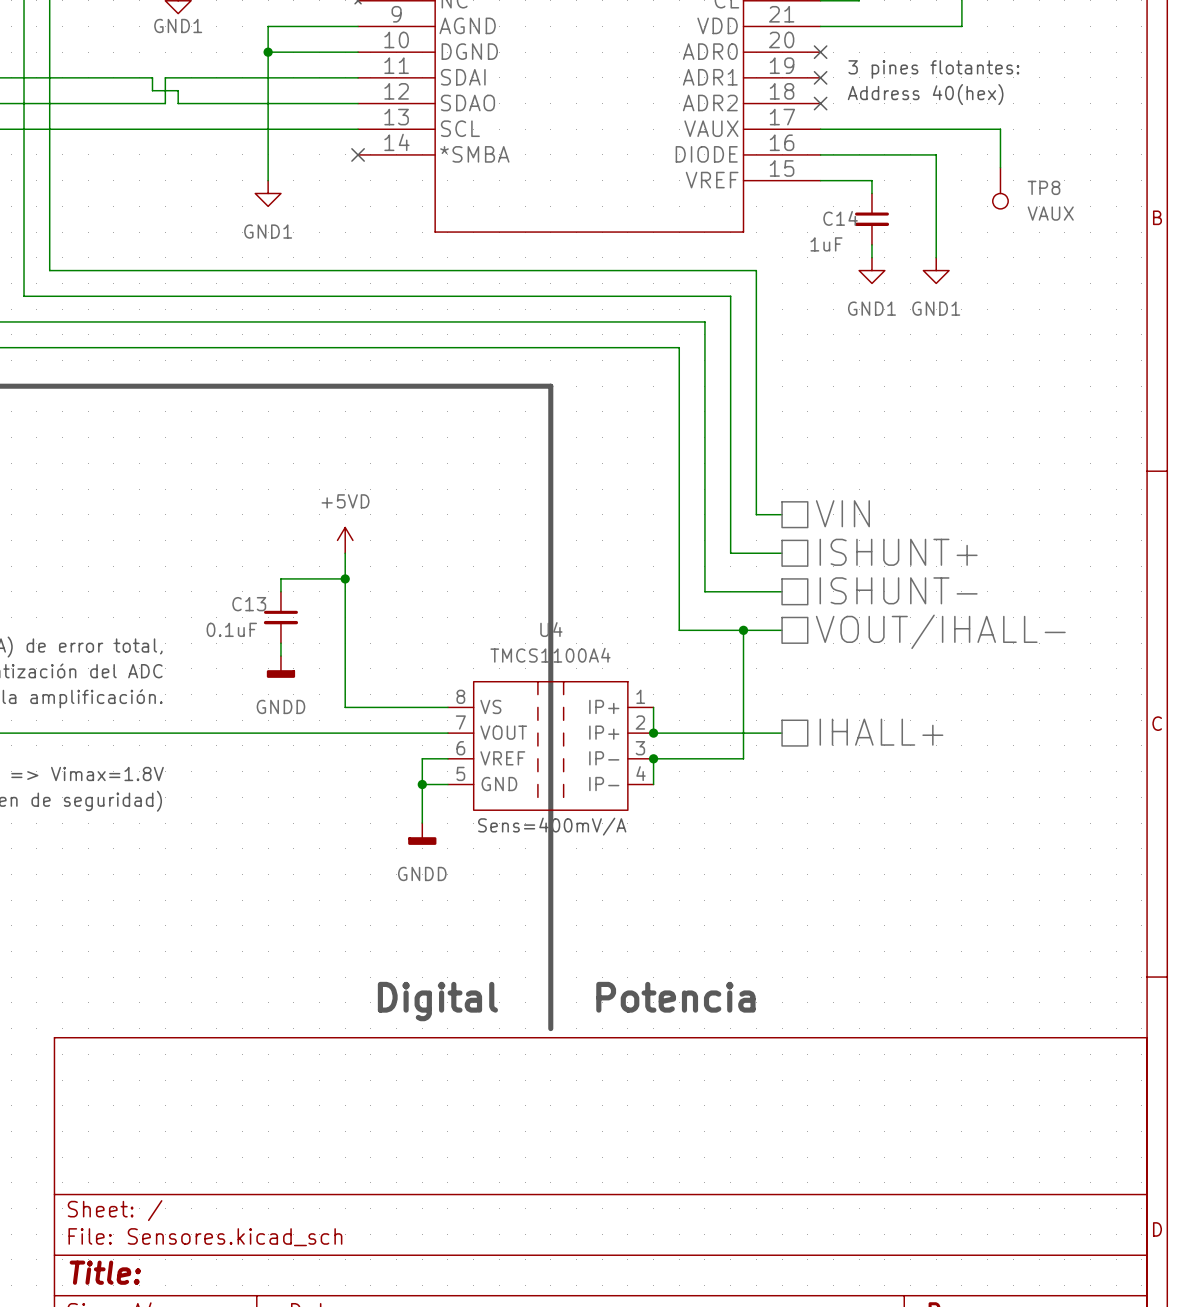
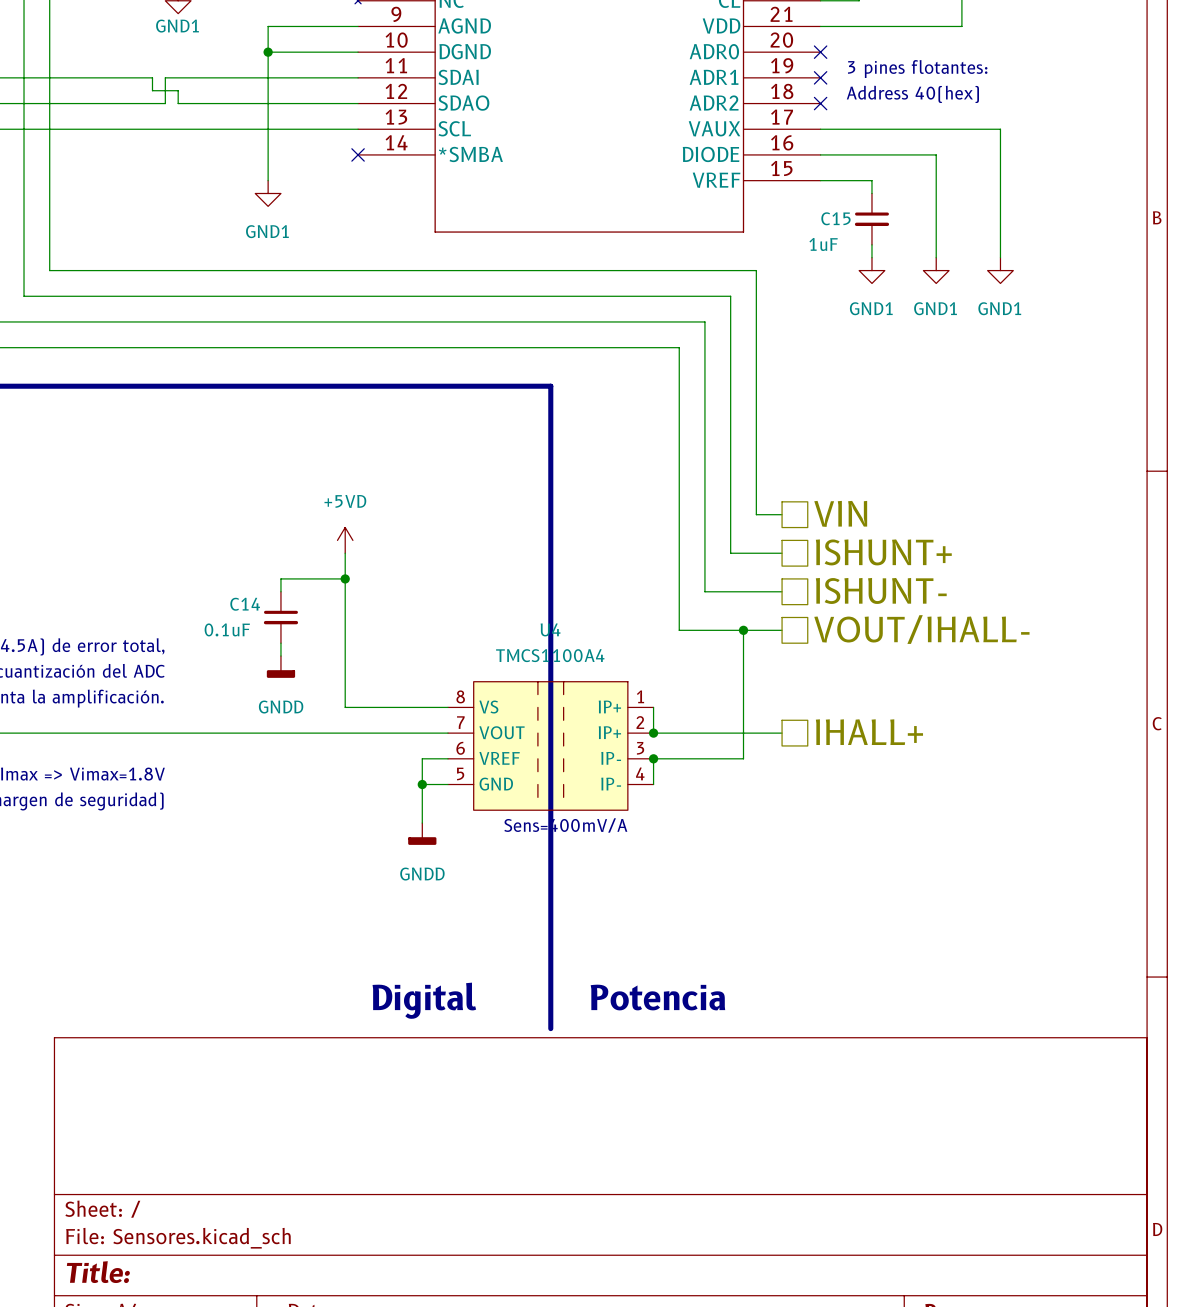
wire: none -> (1000, 167) (1000, 257)
TP8: VAUX (1000, 188) -> none
C14 name: C14 (840, 218) -> C15 (835, 218)
power symbol: none -> GND1 (1000, 270)
C13 name: C13 (249, 604) -> C14 (245, 604)

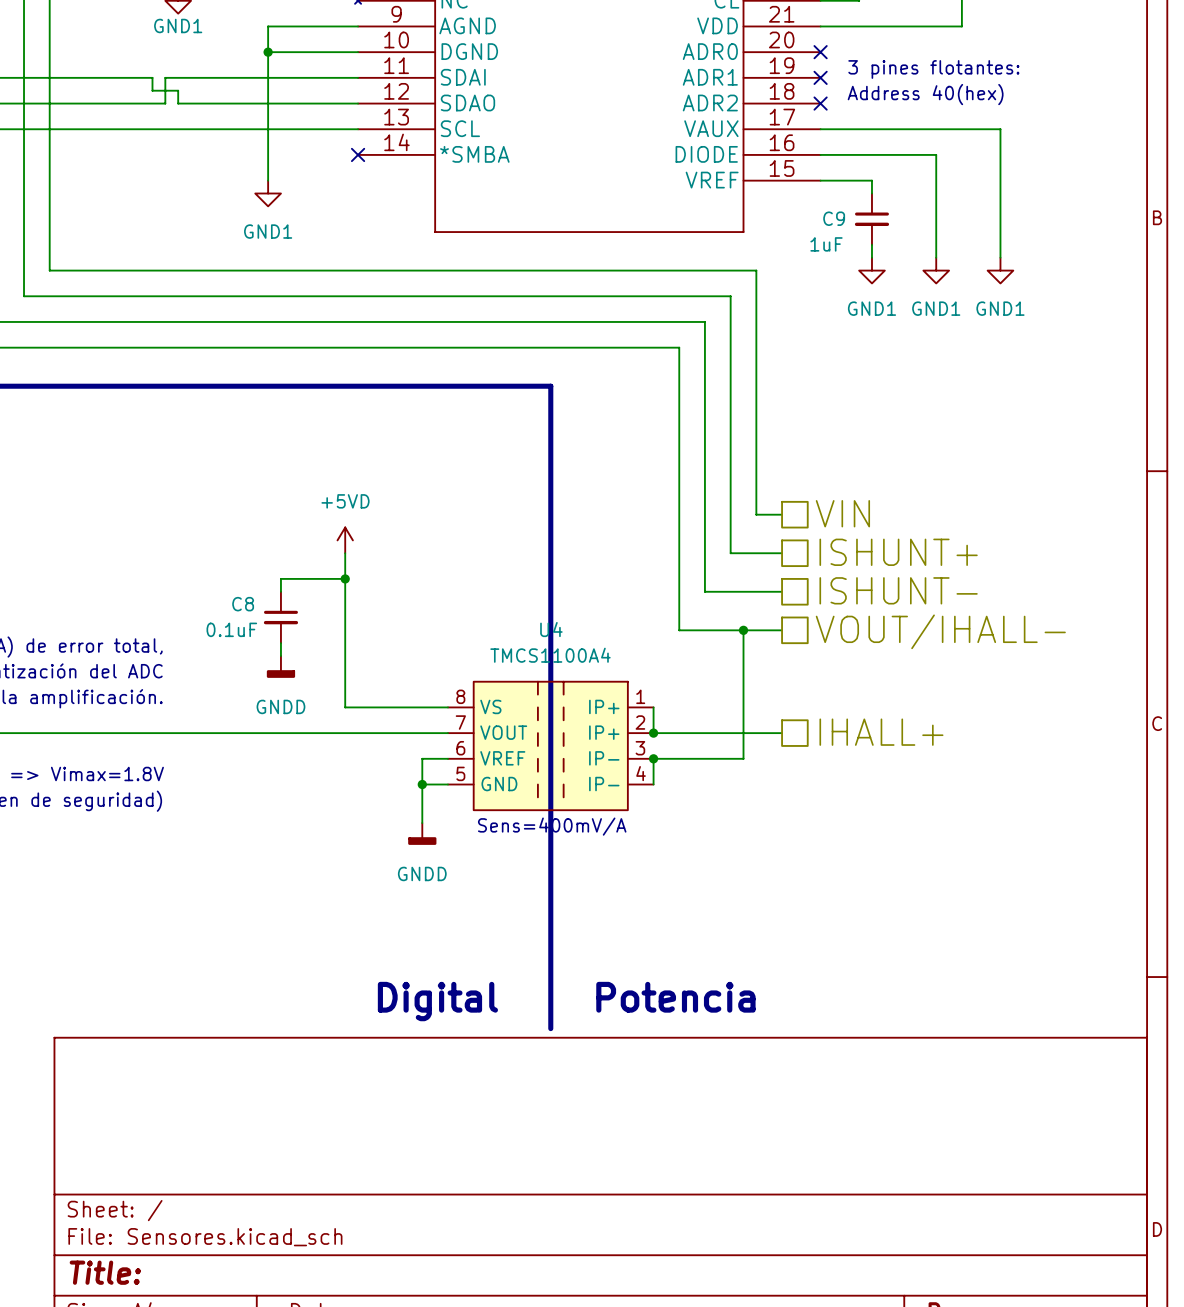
C15 name: C15 (835, 218) -> C9 (834, 218)
C14 name: C14 (245, 604) -> C8 (243, 604)

